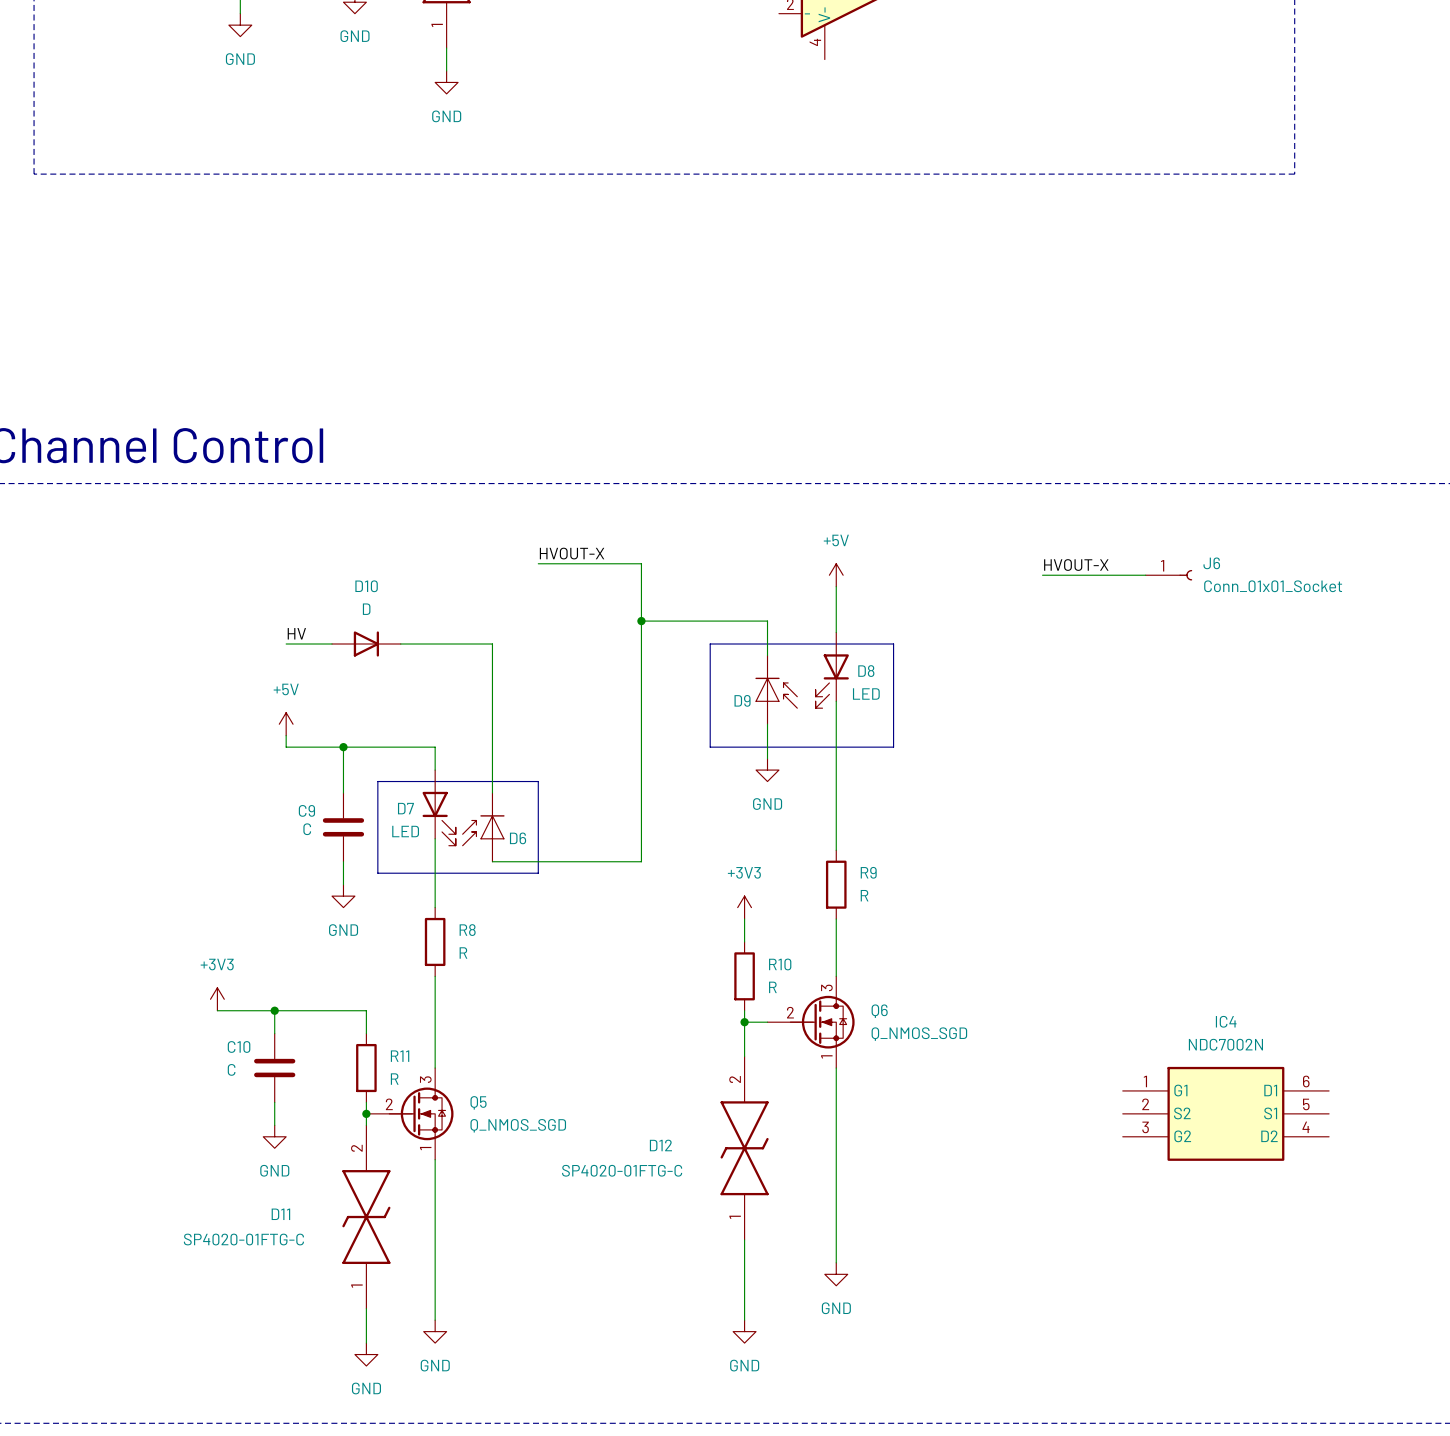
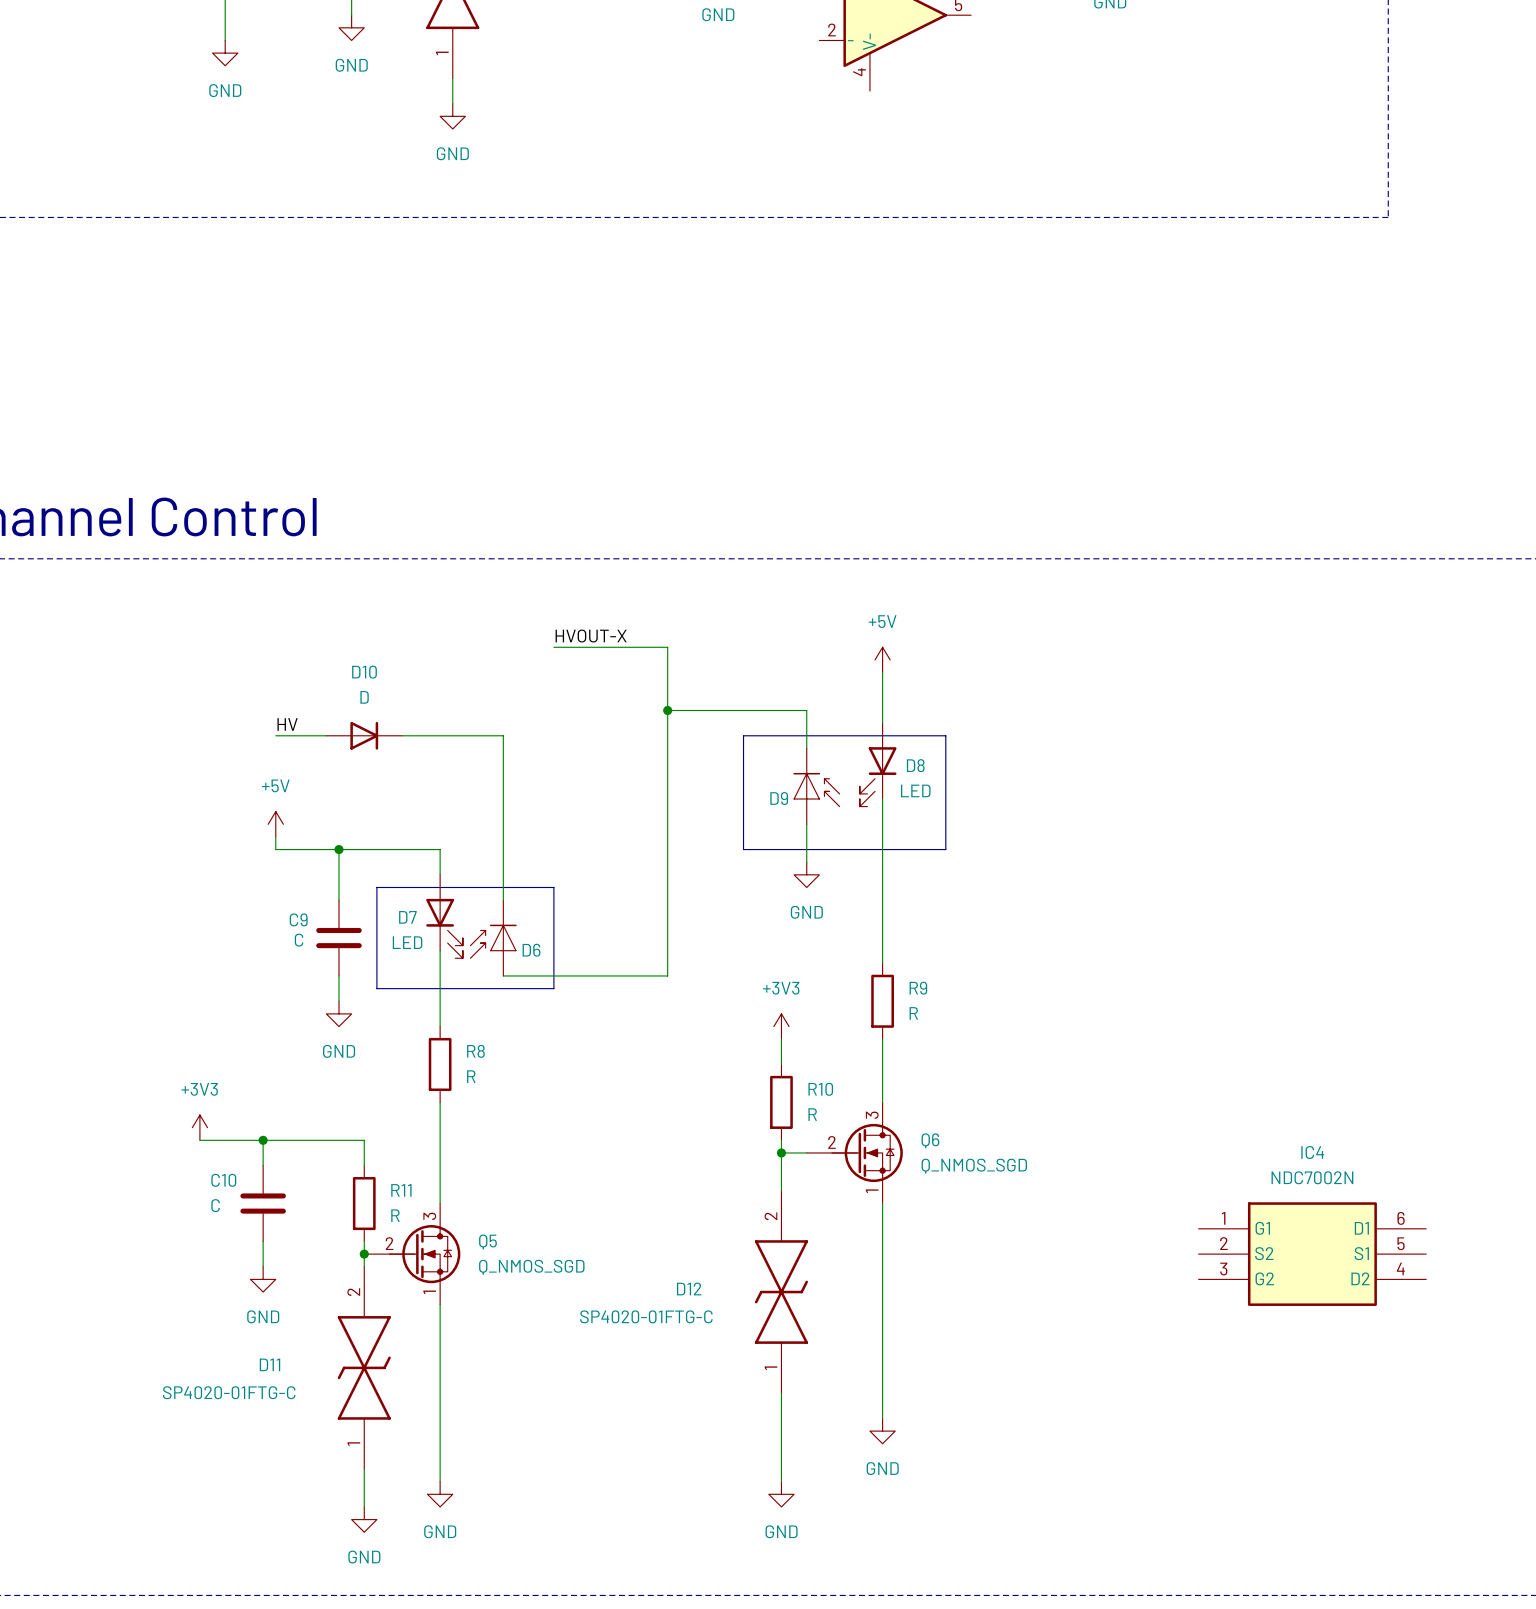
label: HVOUT-X (1076, 565) -> none
wire: (1042, 575) (1145, 575) -> none
J6: Conn_01x01_Socket (1168, 575) -> none

